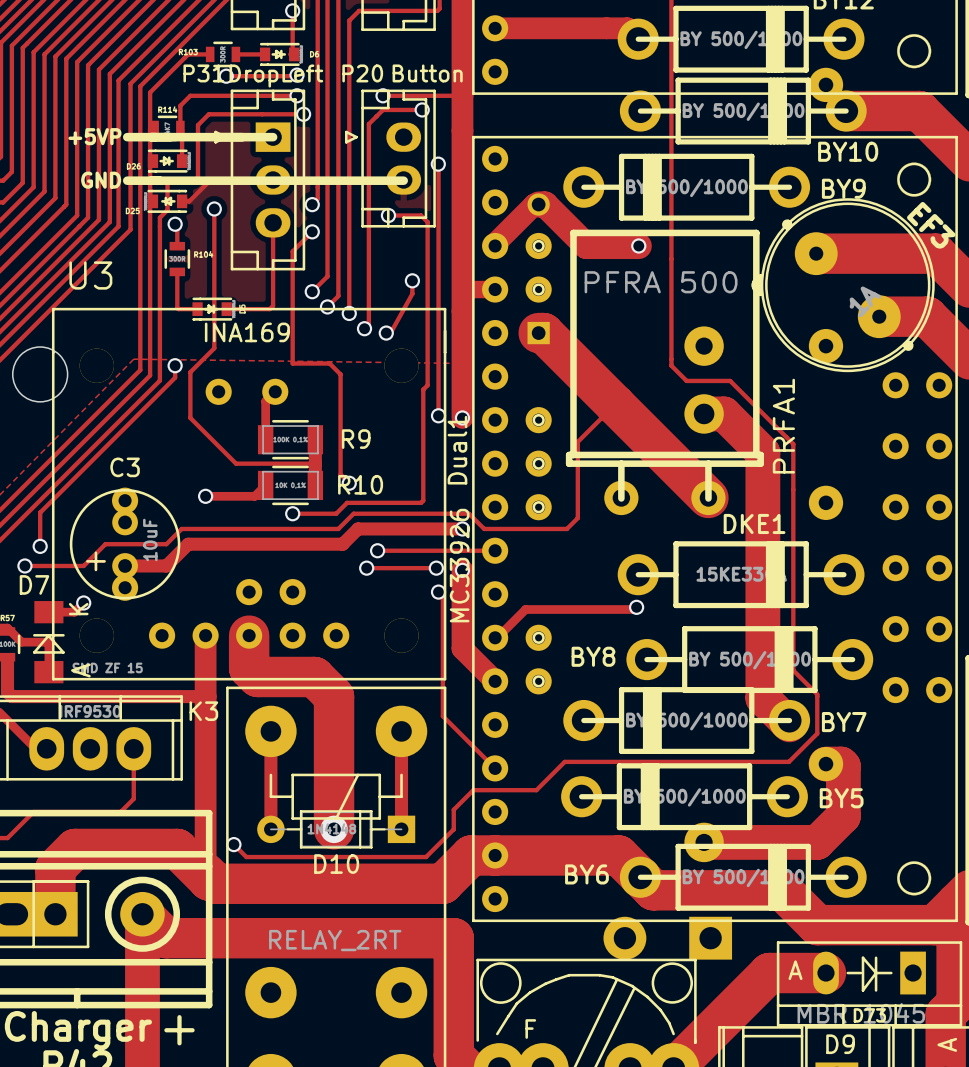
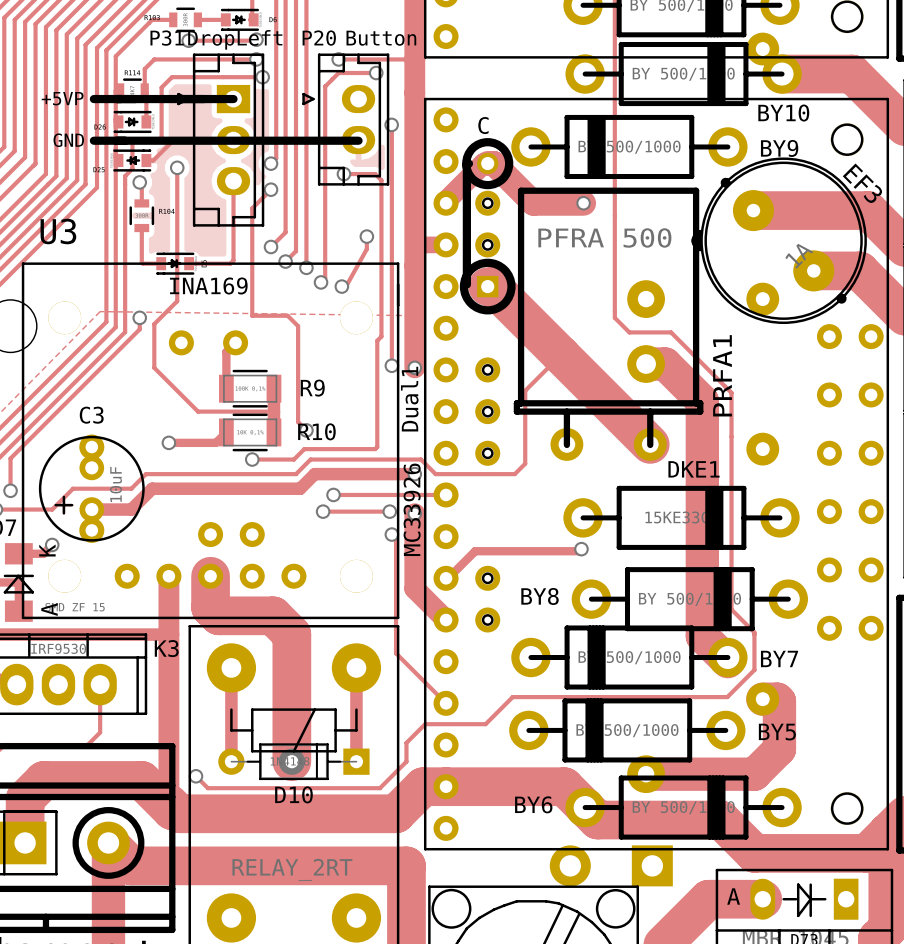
text: none -> C (483, 125)
drawing: none -> [462, 138, 514, 190]
line: none -> (468, 163) (466, 163) (466, 284)
drawing: none -> [459, 258, 516, 315]

